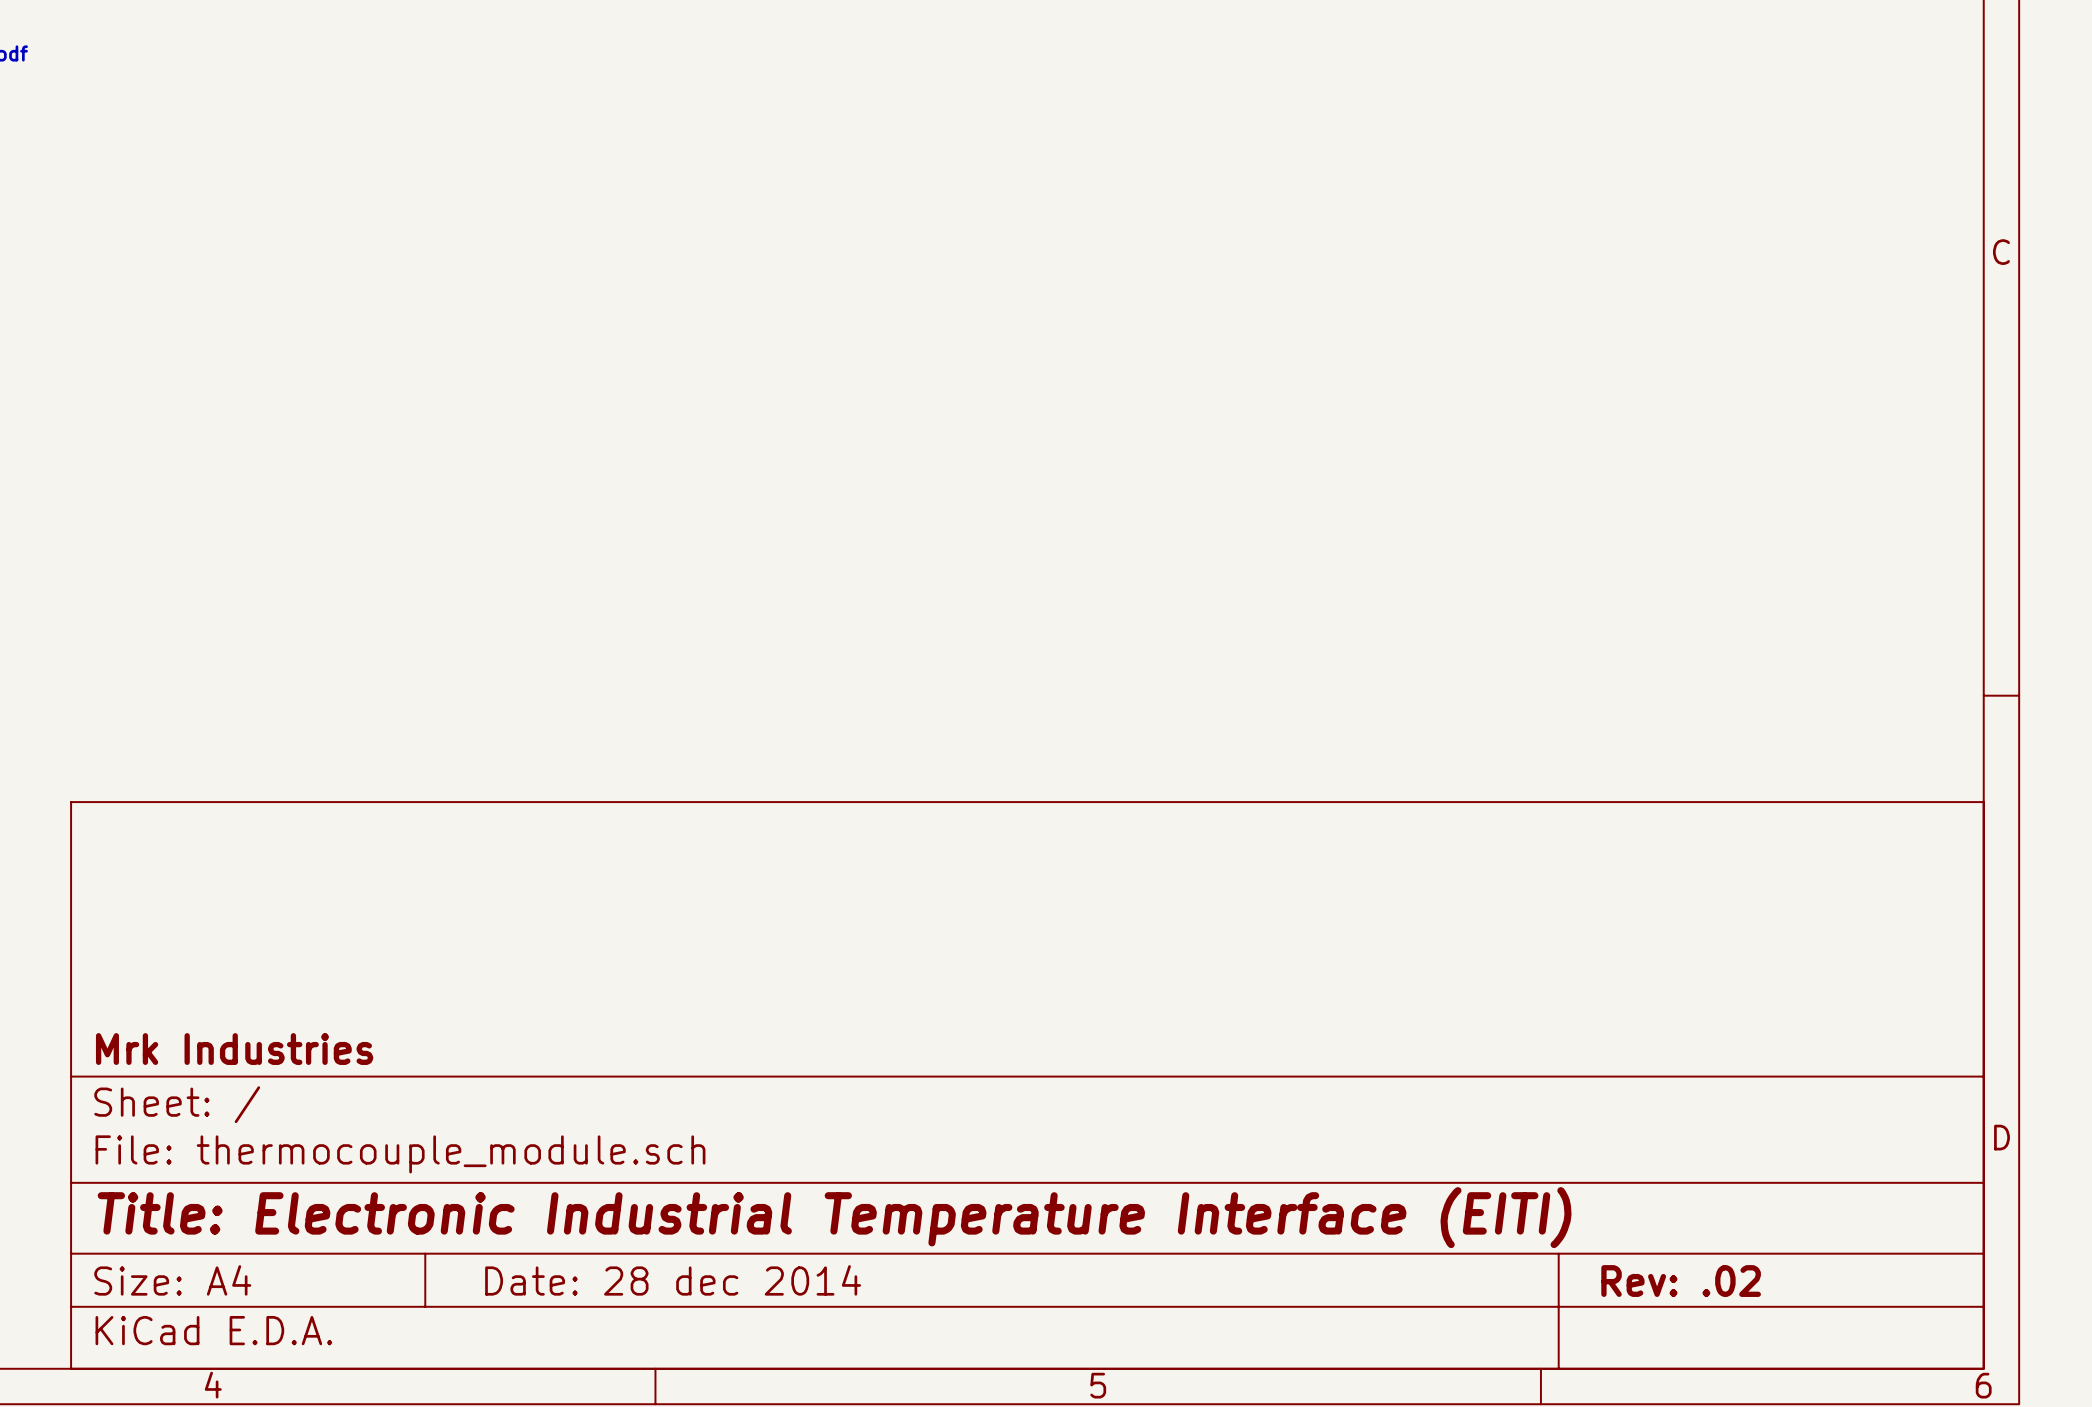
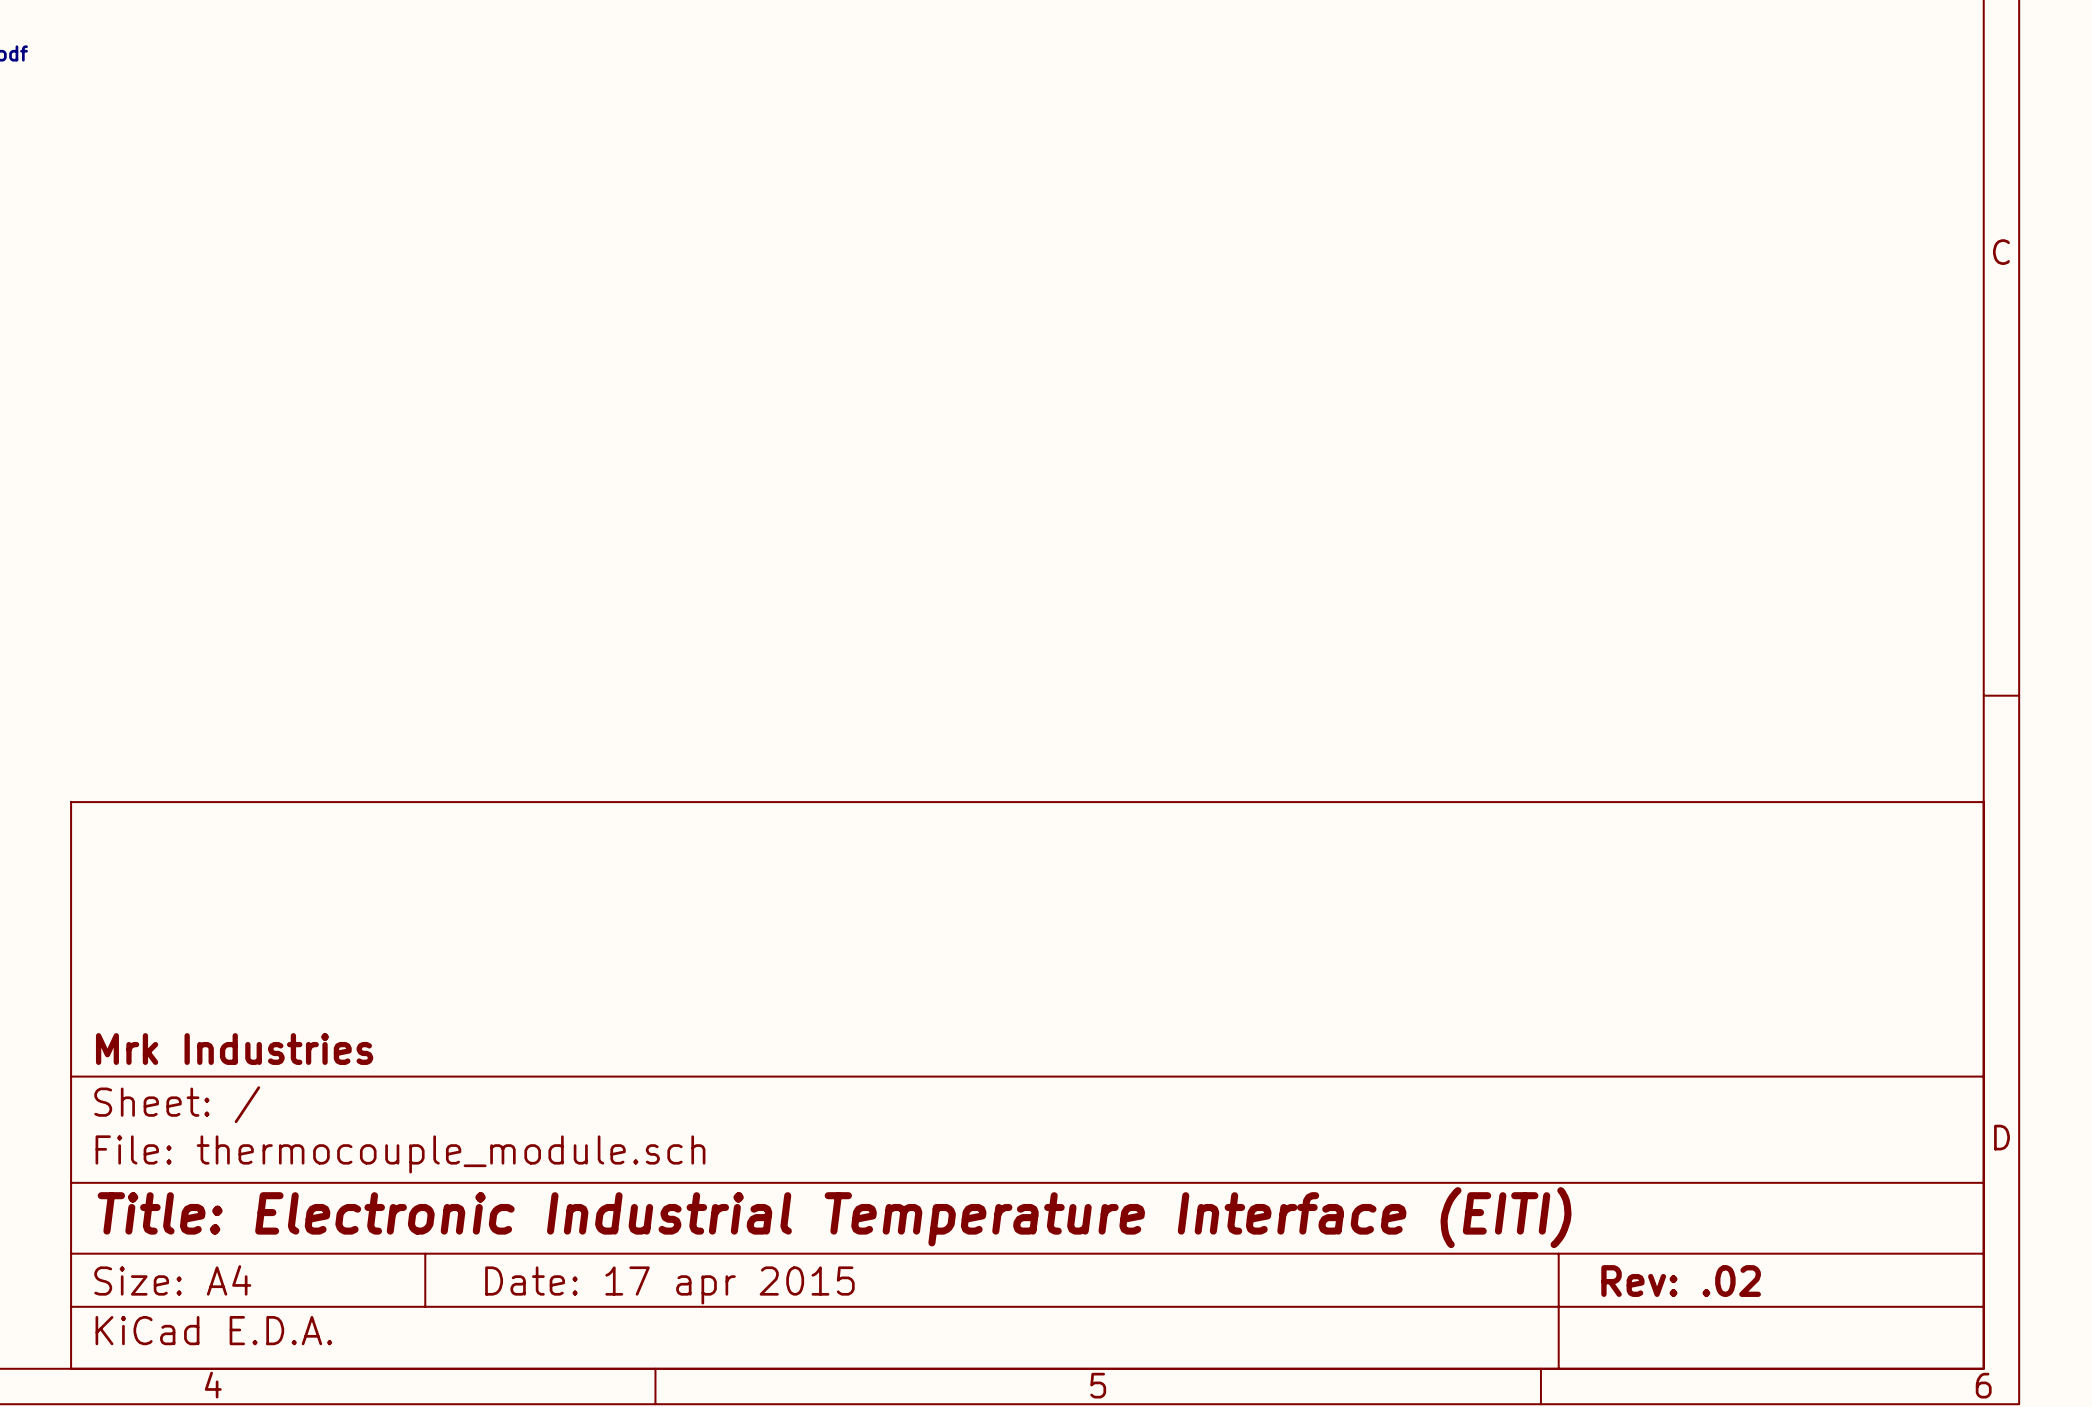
title block: Date: 28 dec 2014 (673, 1280) -> Date: 17 apr 2015 (669, 1285)

